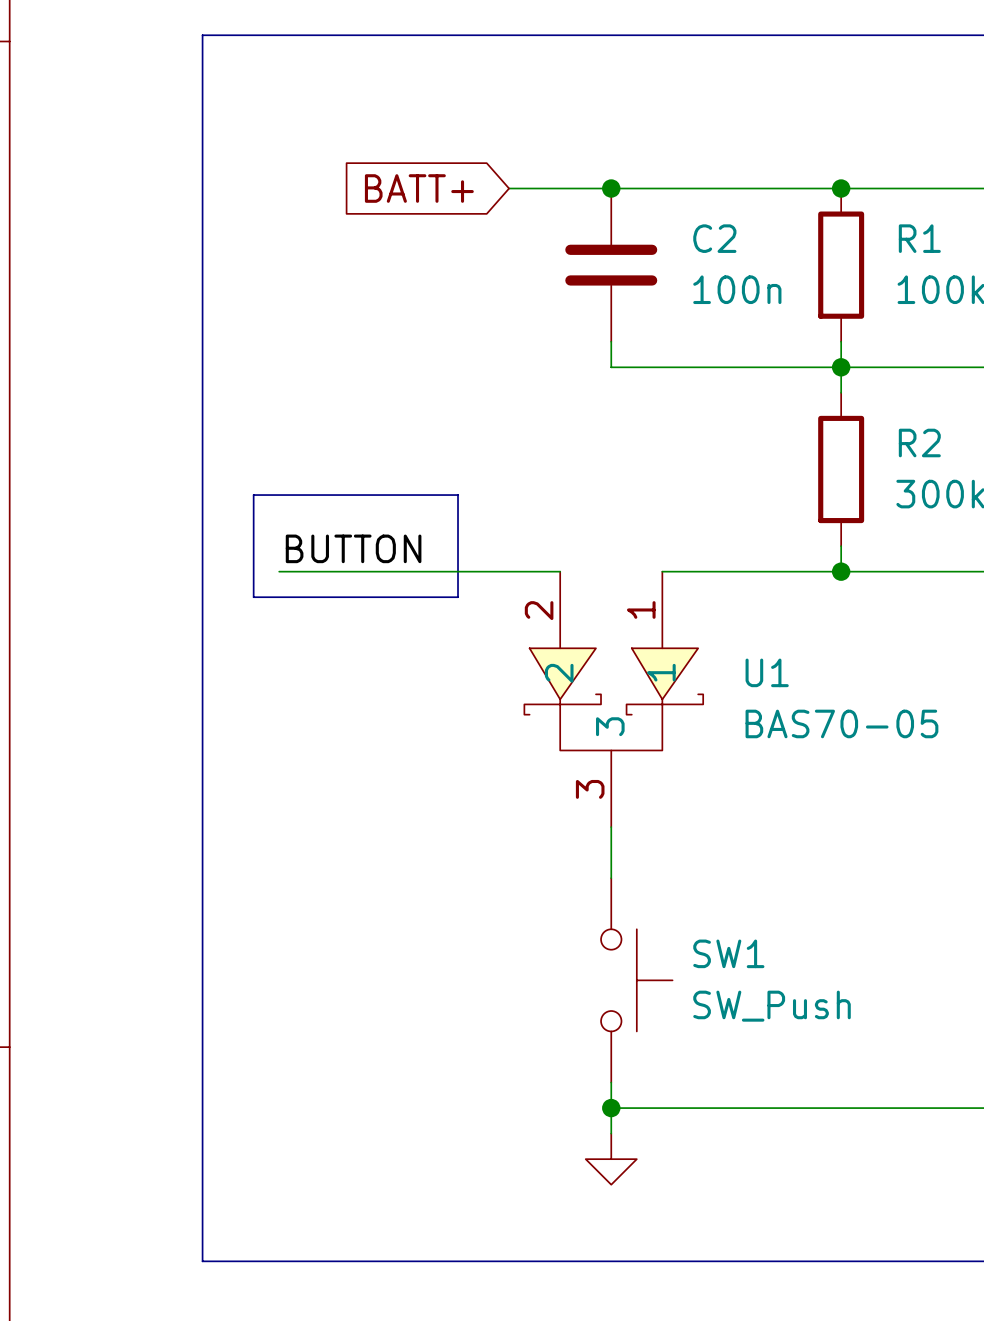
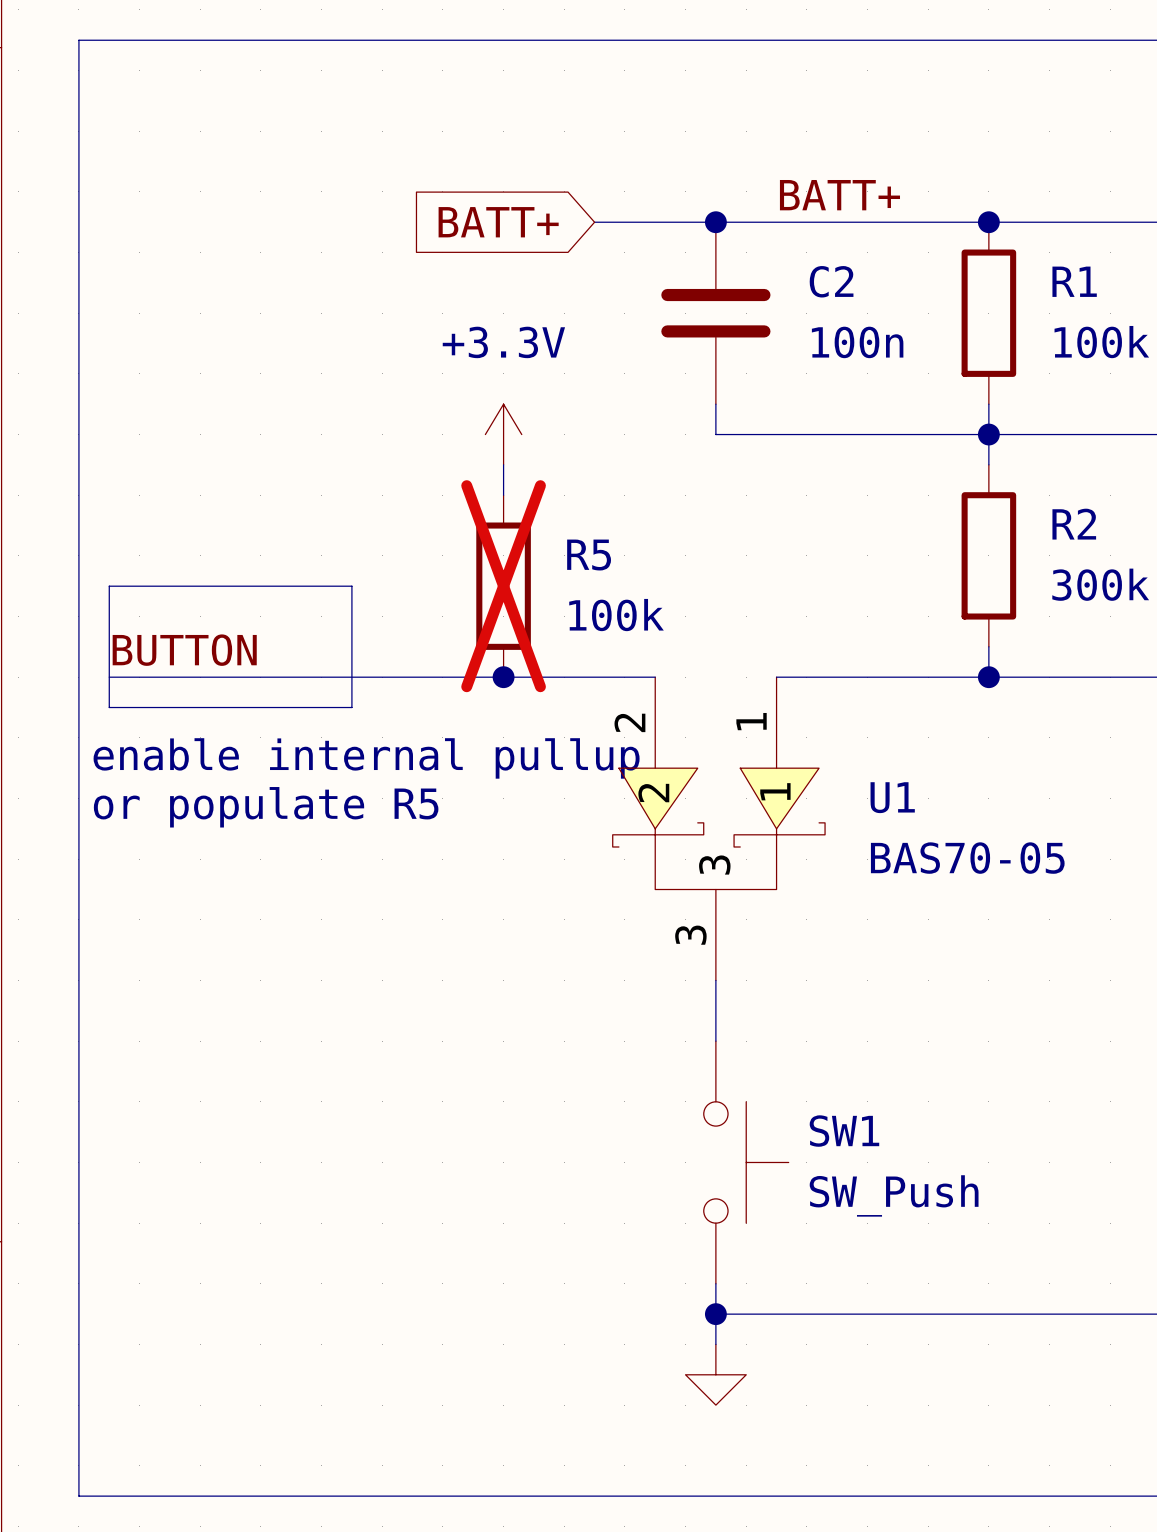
line: (202, 35) (202, 1261) -> (230, 40) (78, 40) (78, 1496) (230, 1496)
label: none -> BATT+ (839, 195)
power symbol: none -> +3.3V (503, 434)
wire: none -> (503, 464) (503, 495)
line: (253, 495) (253, 597) -> (291, 586) (109, 586) (109, 707) (291, 707)
line: (304, 495) (458, 495) (458, 597) (304, 597) -> (351, 586) (351, 707)
R5: none -> 100k (503, 586)
label position: BUTTON (353, 548) -> BUTTON (184, 650)
wire: none -> (109, 677) (321, 677)
junction: none -> (503, 677)
text: none -> enable internal pullup (366, 758)
text: none -> or populate R5 (266, 807)

